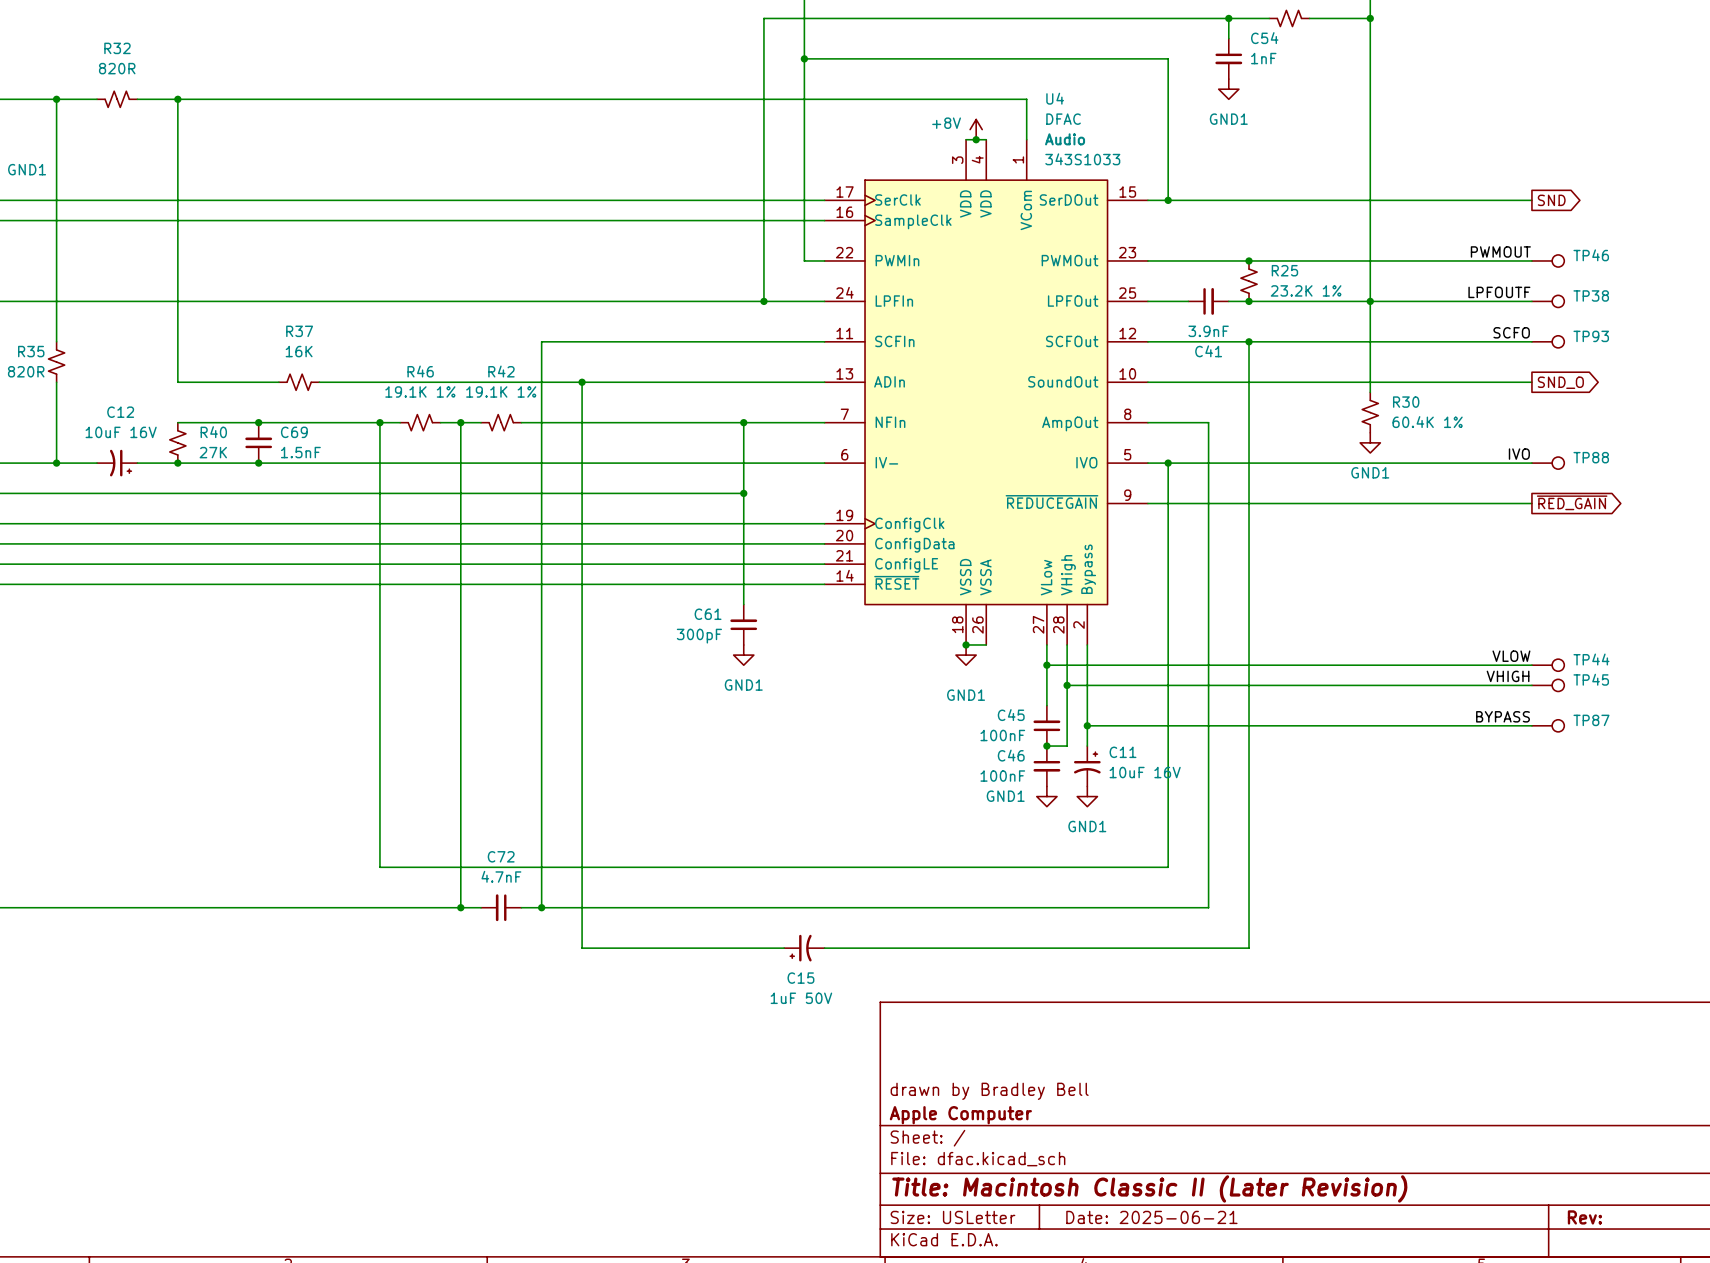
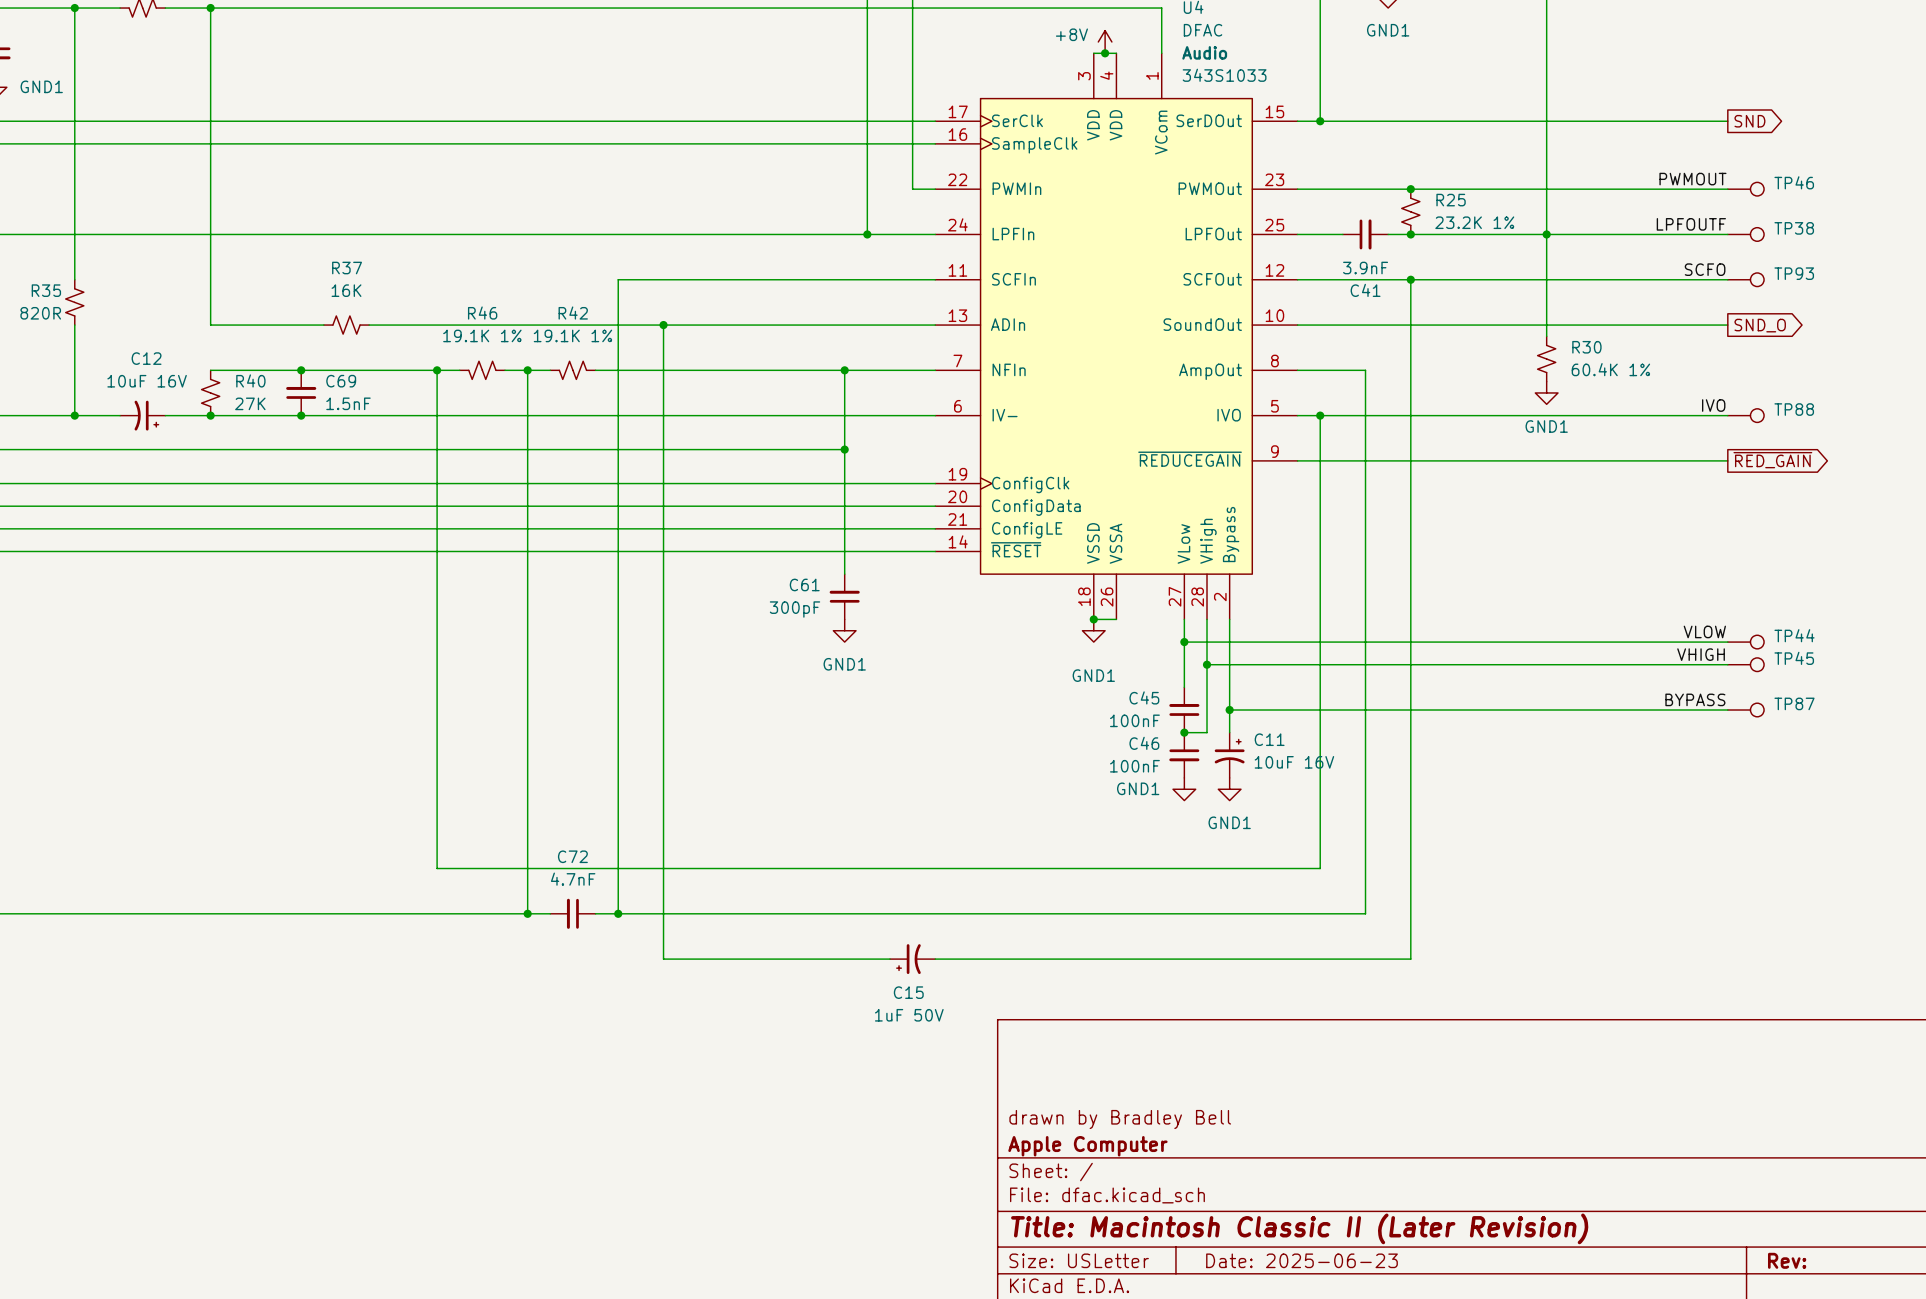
title block: Date: 2025-06-21 (1151, 1217) -> Date: 2025-06-23 (1302, 1260)

